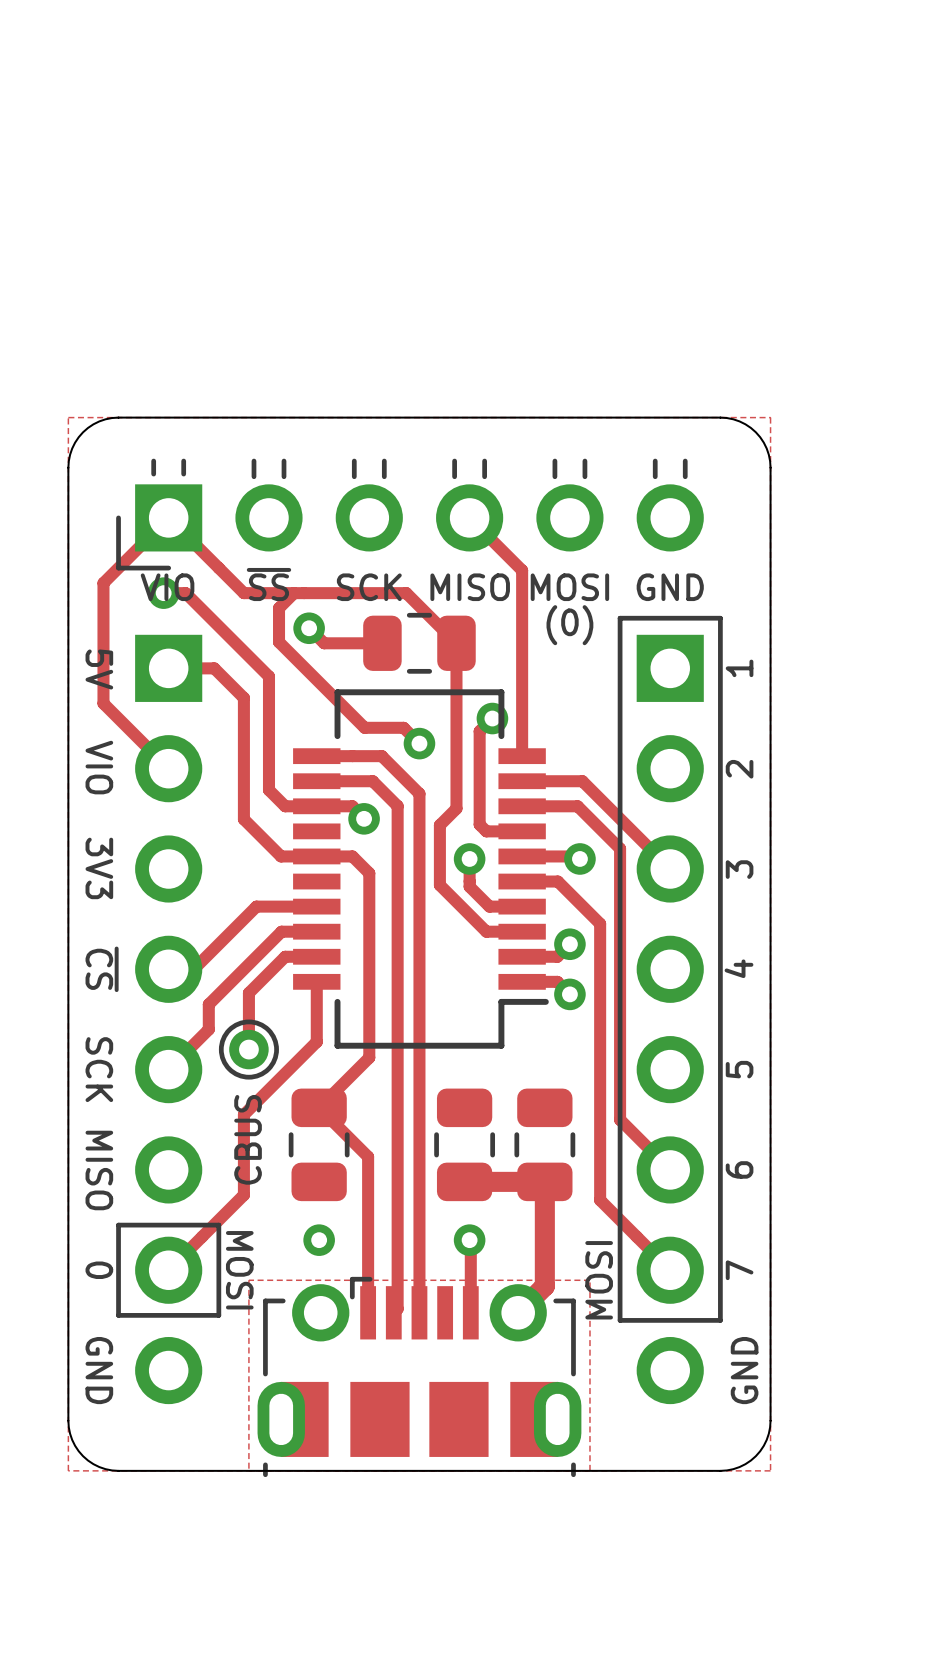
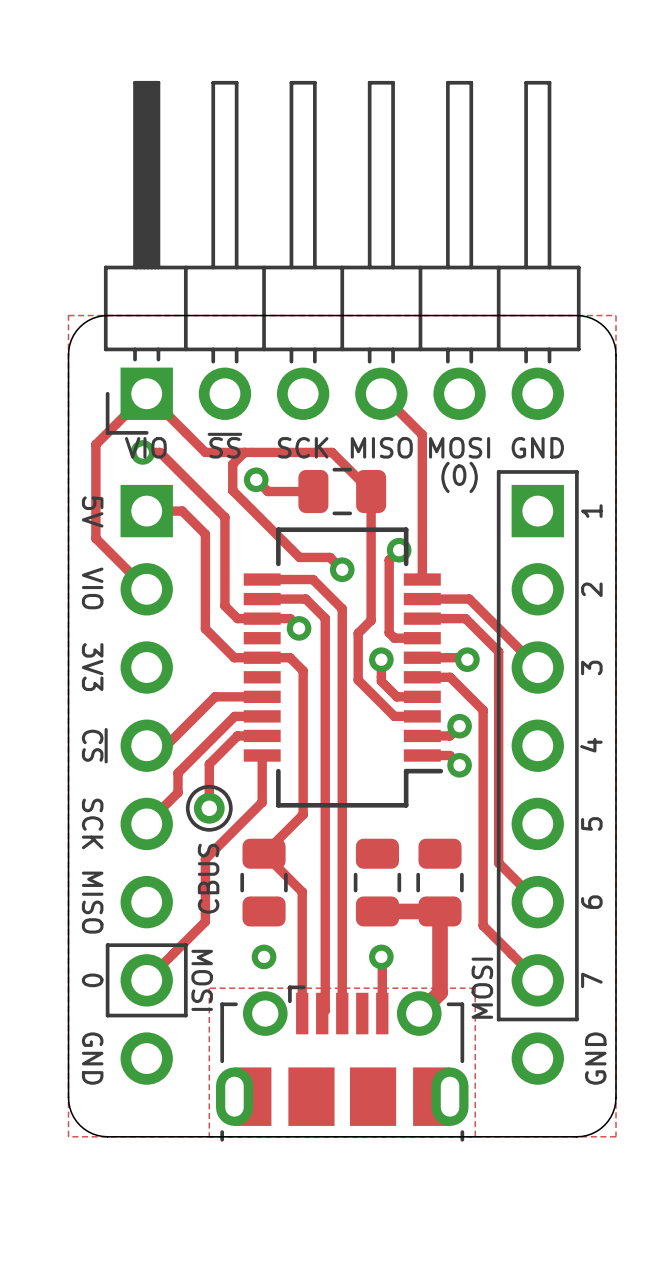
part: none -> (342, 257)
part: (409, 514) -> none

